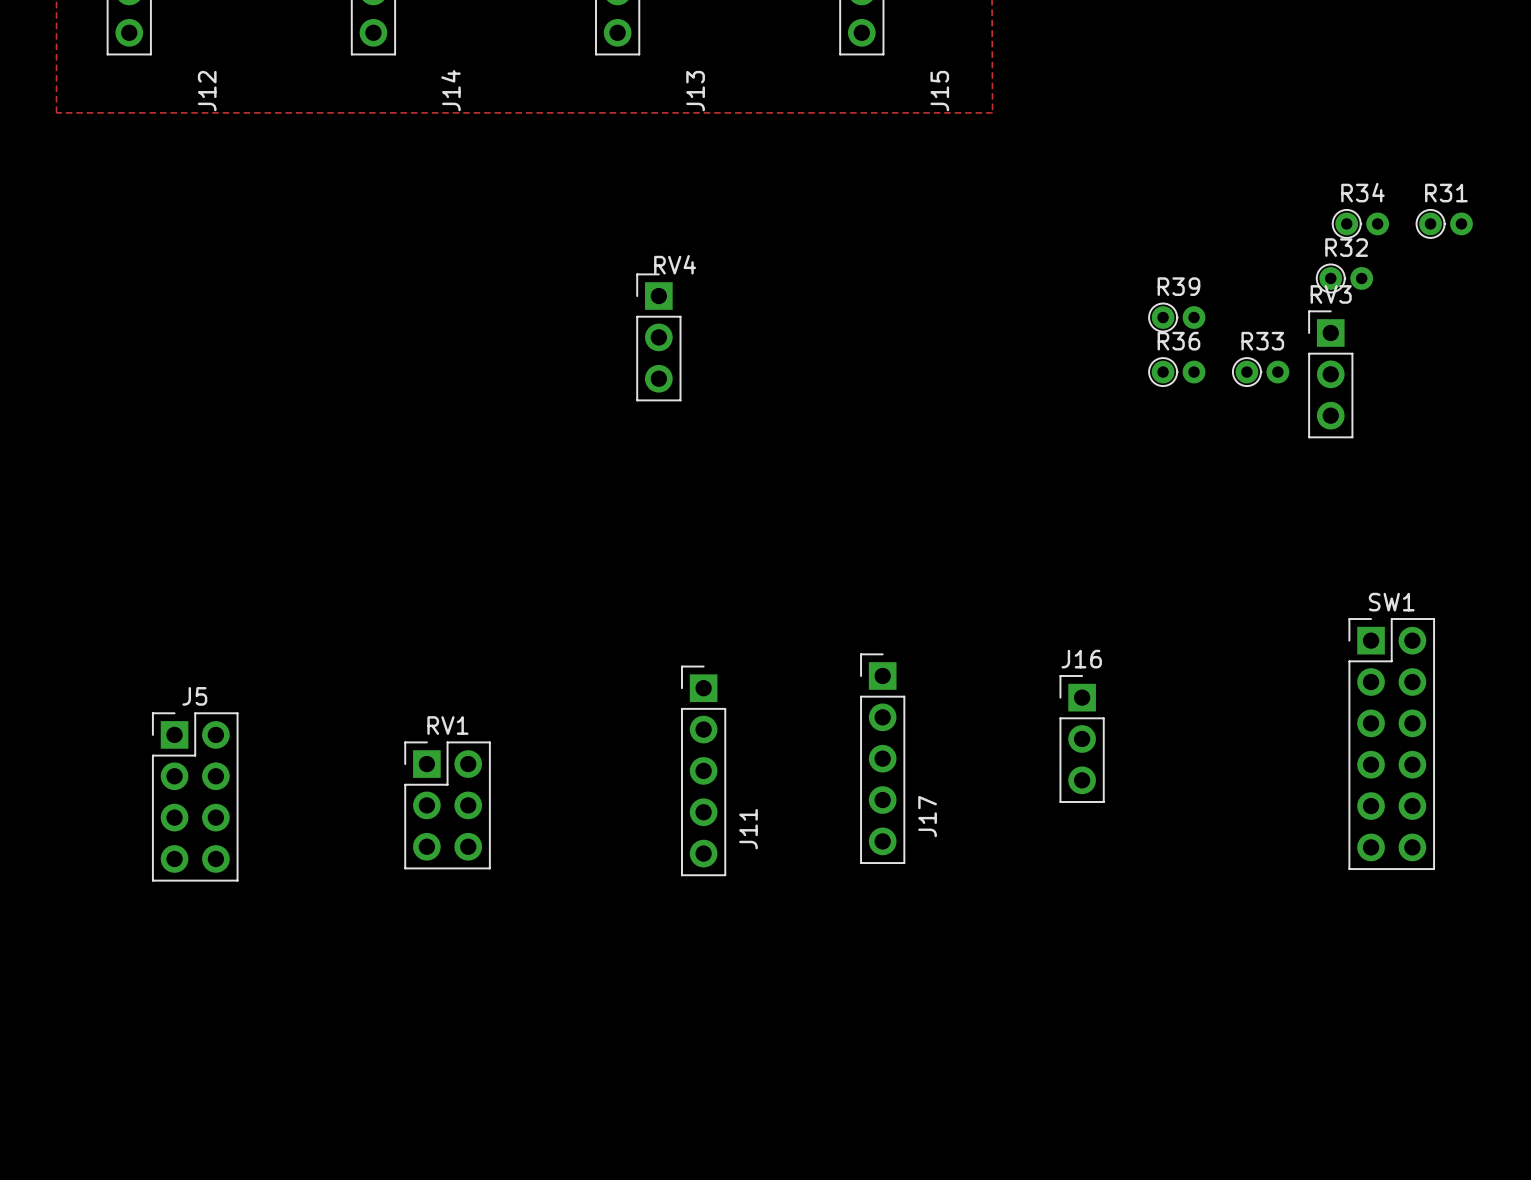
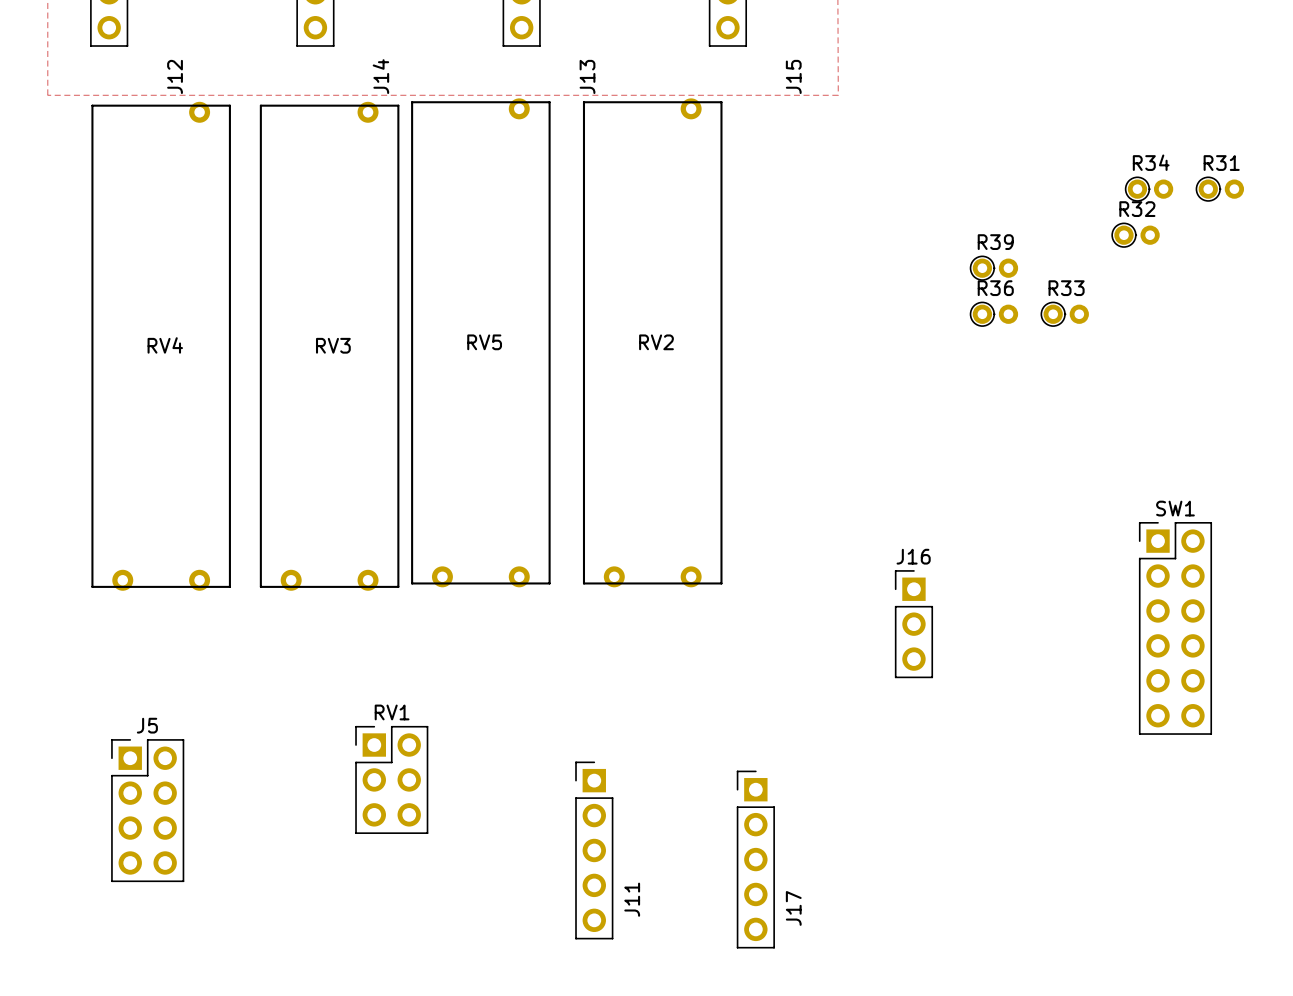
RV4 name position: RV4 (675, 264) -> RV4 (165, 345)
RV4 footprint: [636, 273, 682, 402] -> [91, 101, 231, 591]
RV3 name position: RV3 (1331, 294) -> RV3 (333, 345)
RV3 footprint: [1308, 310, 1354, 439] -> [259, 101, 400, 591]
RV5: none -> (480, 342)
RV2: none -> (652, 342)
J17 position: (882, 758) -> (755, 859)
J11 position: (703, 770) -> (594, 850)
J5 position: (195, 796) -> (147, 810)
RV1 position: (447, 805) -> (391, 779)

